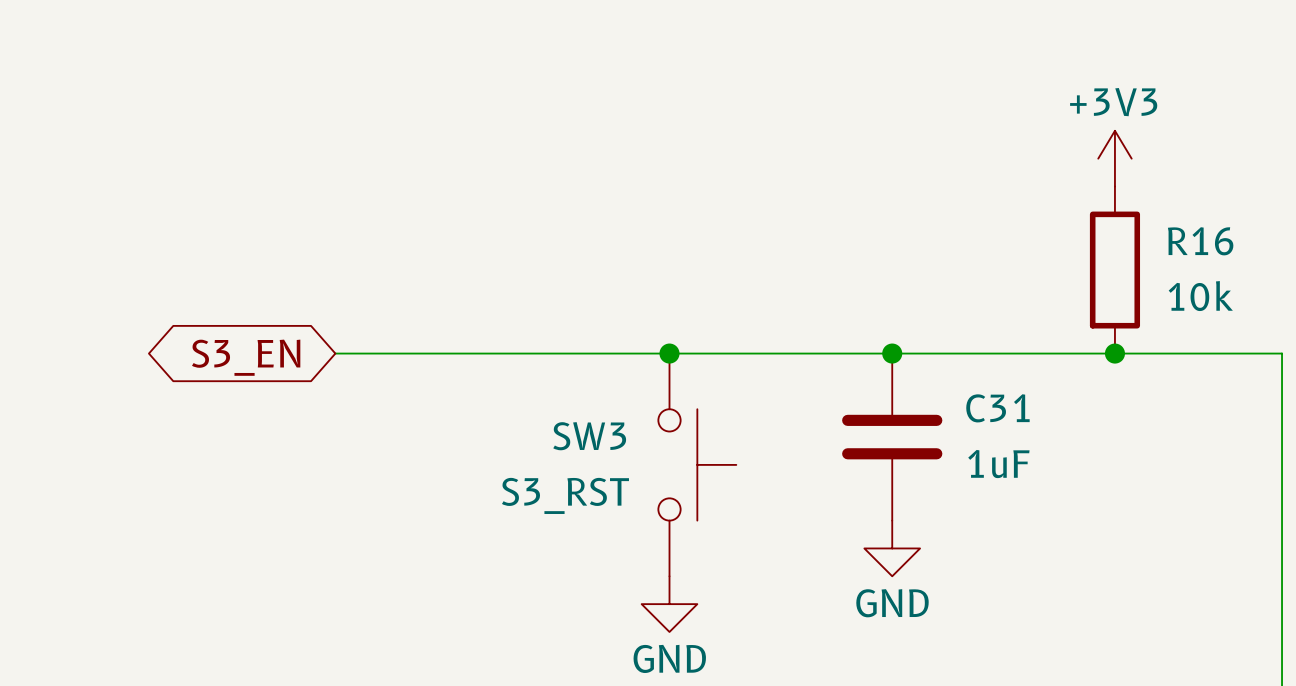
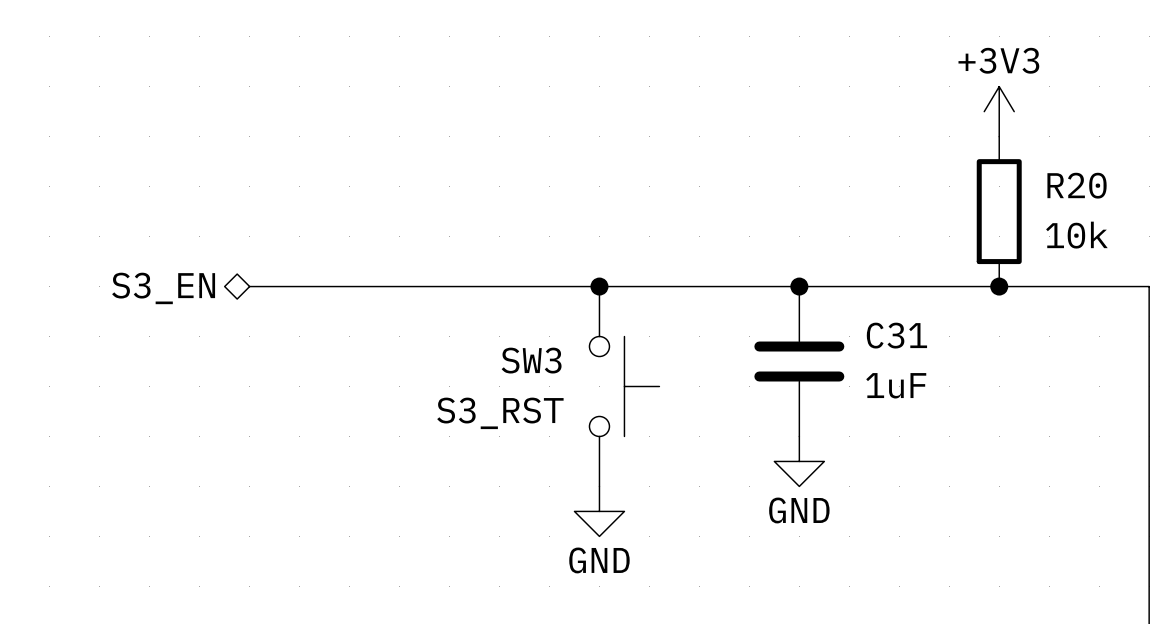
R16 name: R16 (1200, 241) -> R20 (1077, 185)
wire: none -> (249, 286) (299, 286)
hierarchical label: none -> S3_EN (163, 288)
global label: S3_EN (246, 357) -> none

